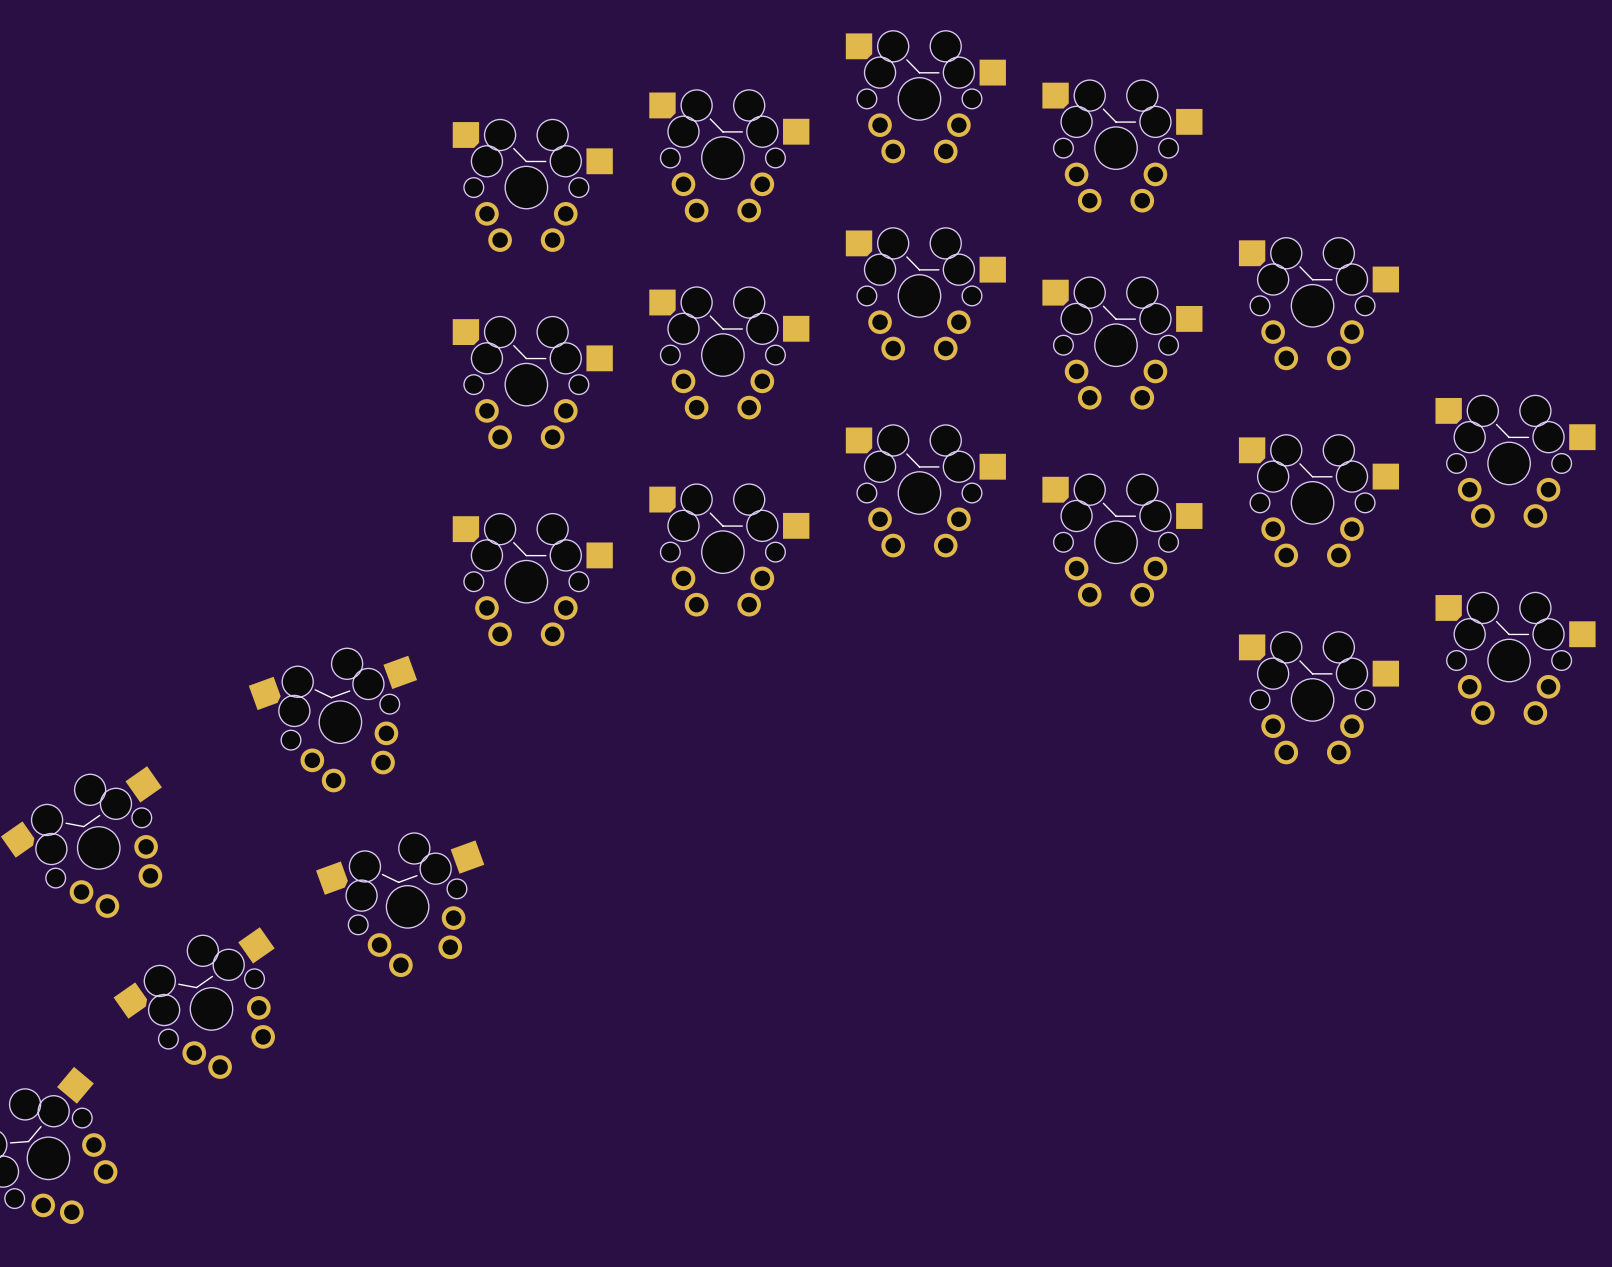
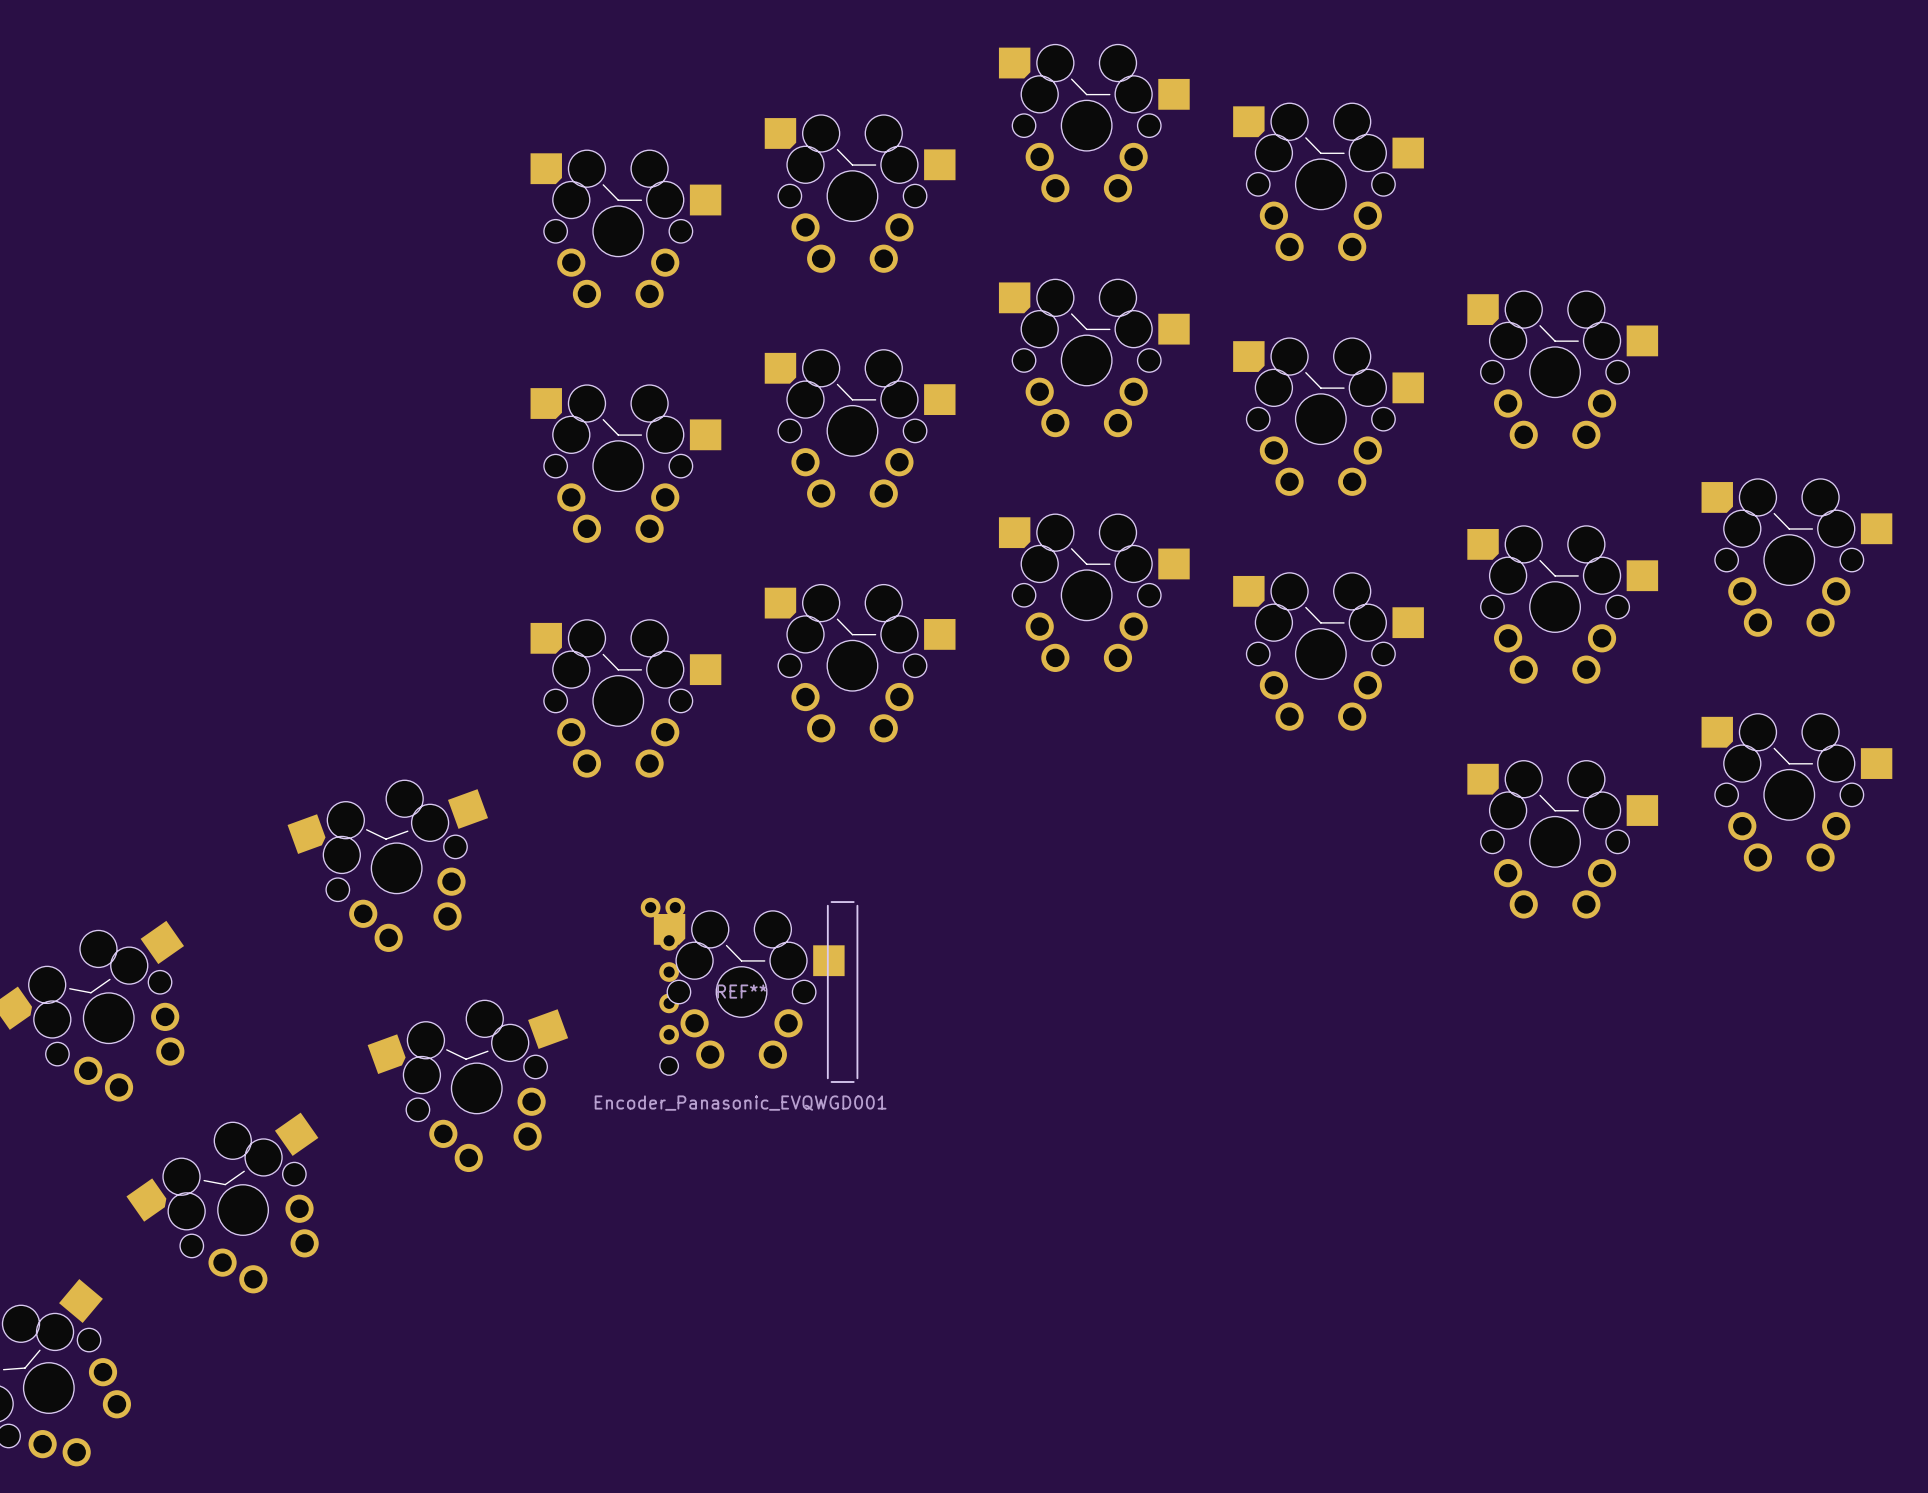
part: none -> (749, 989)
REF**: none -> Encoder_Panasonic_EVQWGD001 (749, 990)

